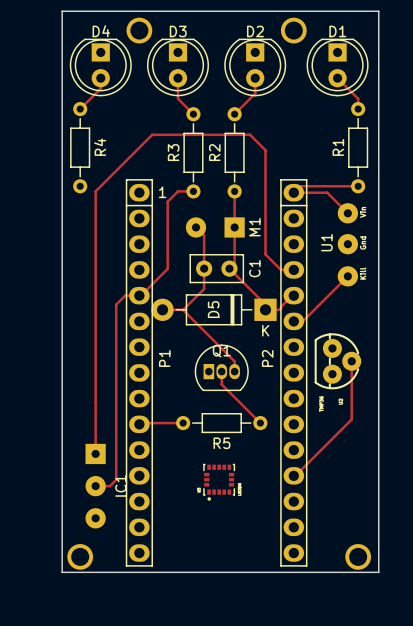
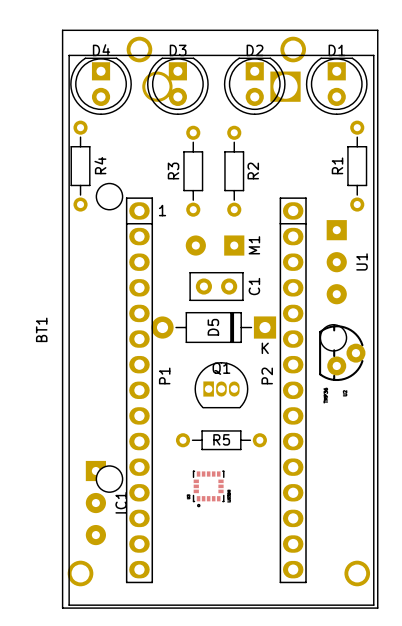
track: (100, 78) (100, 88) (80, 109) -> none
track: (177, 78) (177, 98) (193, 114) -> none
track: (255, 78) (255, 93) (234, 114) -> none
track: (337, 78) (358, 98) (358, 109) -> none
R2 name position: R2 (214, 152) -> R2 (253, 170)
track: (358, 186) (300, 186) (293, 192) -> none
track: (193, 191) (177, 191) (167, 201) (167, 268) (140, 295) (125, 295) (116, 304) (116, 479) (109, 486) (95, 486) -> none
track: (234, 191) (234, 263) (229, 268) (265, 304) (265, 309) (279, 309) (293, 295) -> none
track: (292, 192) (327, 192) (347, 213) -> none
U1 footprint: [337, 203, 358, 287] -> [326, 220, 347, 305]
track: (196, 227) (204, 235) (204, 288) (183, 309) -> none
U1 name position: U1 (326, 242) -> U1 (361, 261)
track: (293, 269) (280, 269) (265, 254) (265, 150) (250, 134) (152, 134) (95, 191) (95, 453) -> none
track: (347, 276) (302, 321) (293, 321) -> none
track: (162, 309) (182, 309) (234, 361) (234, 371) -> none
BT1: none -> (221, 330)
part position: (337, 361) -> (342, 353)
track: (351, 361) (351, 419) (293, 475) -> none
track: (221, 371) (221, 384) (260, 423) -> none
track: (183, 423) (139, 424) -> none
R5 name position: R5 (221, 443) -> R5 (221, 439)
part position: (219, 482) -> (208, 488)
board edge: (62, 572) (378, 572) -> (62, 588) (62, 608) (377, 608) (377, 588)

